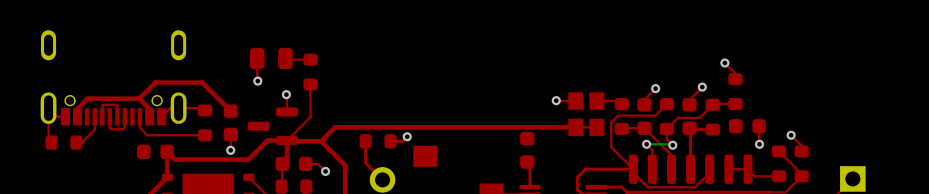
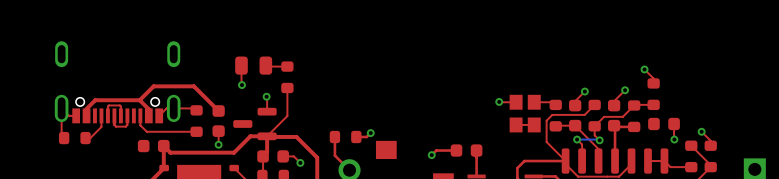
top track: (575, 127) (335, 127) (321, 141) -> none
part rotation: 0° (527, 150) -> 90° clockwise (466, 150)
top track: none -> (456, 150) (436, 150) (431, 155)
via: none -> (431, 155)

